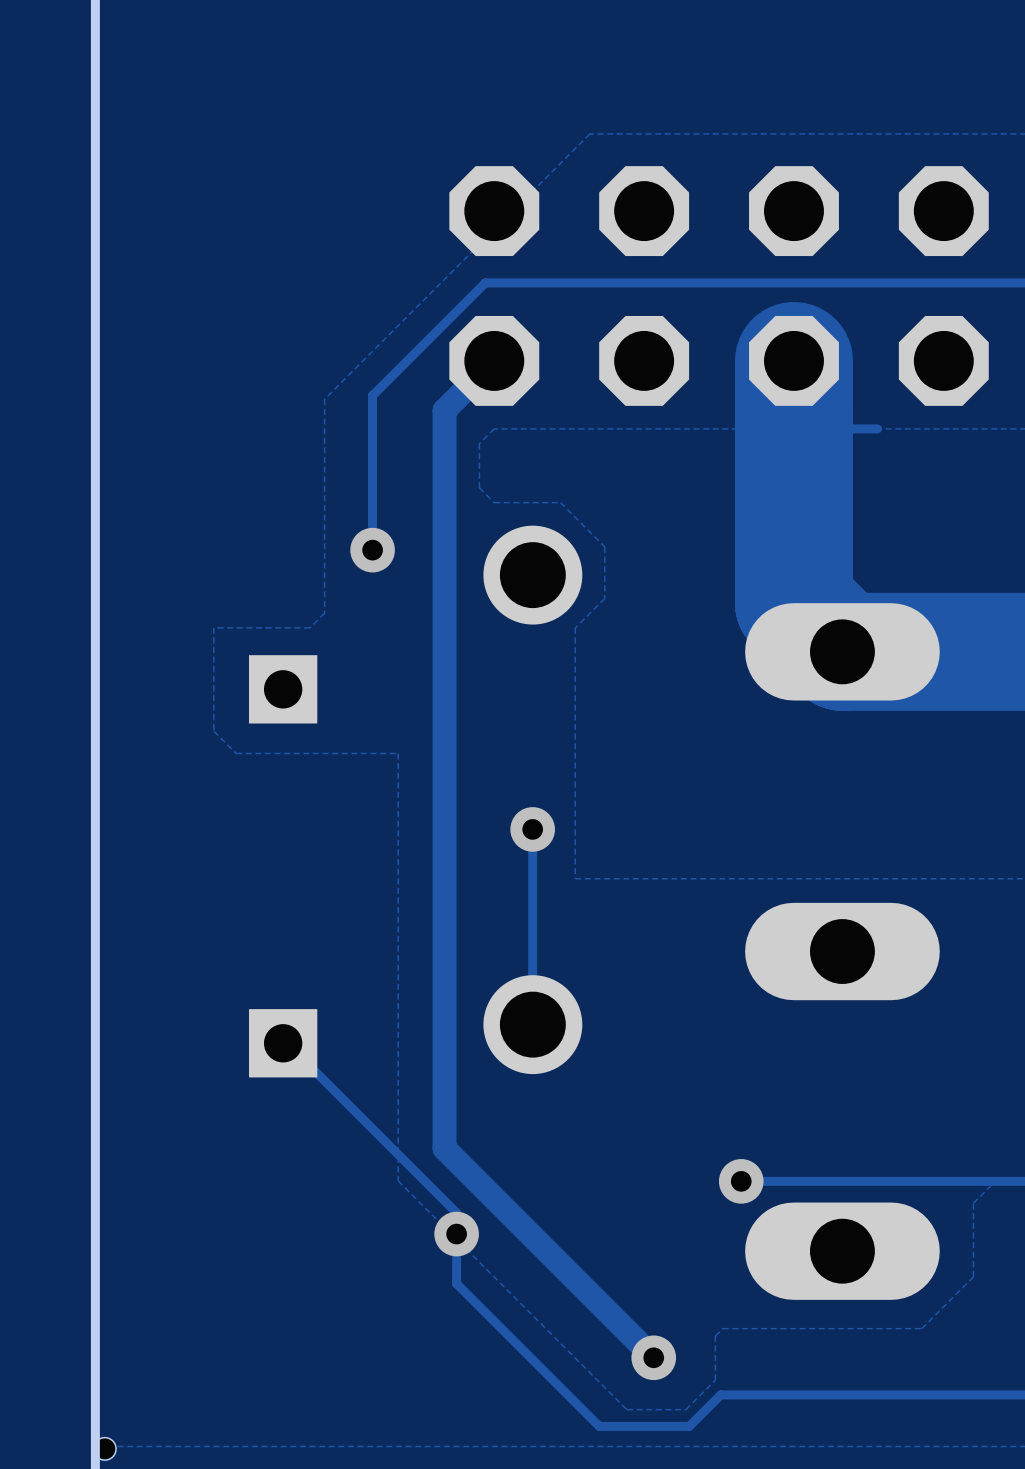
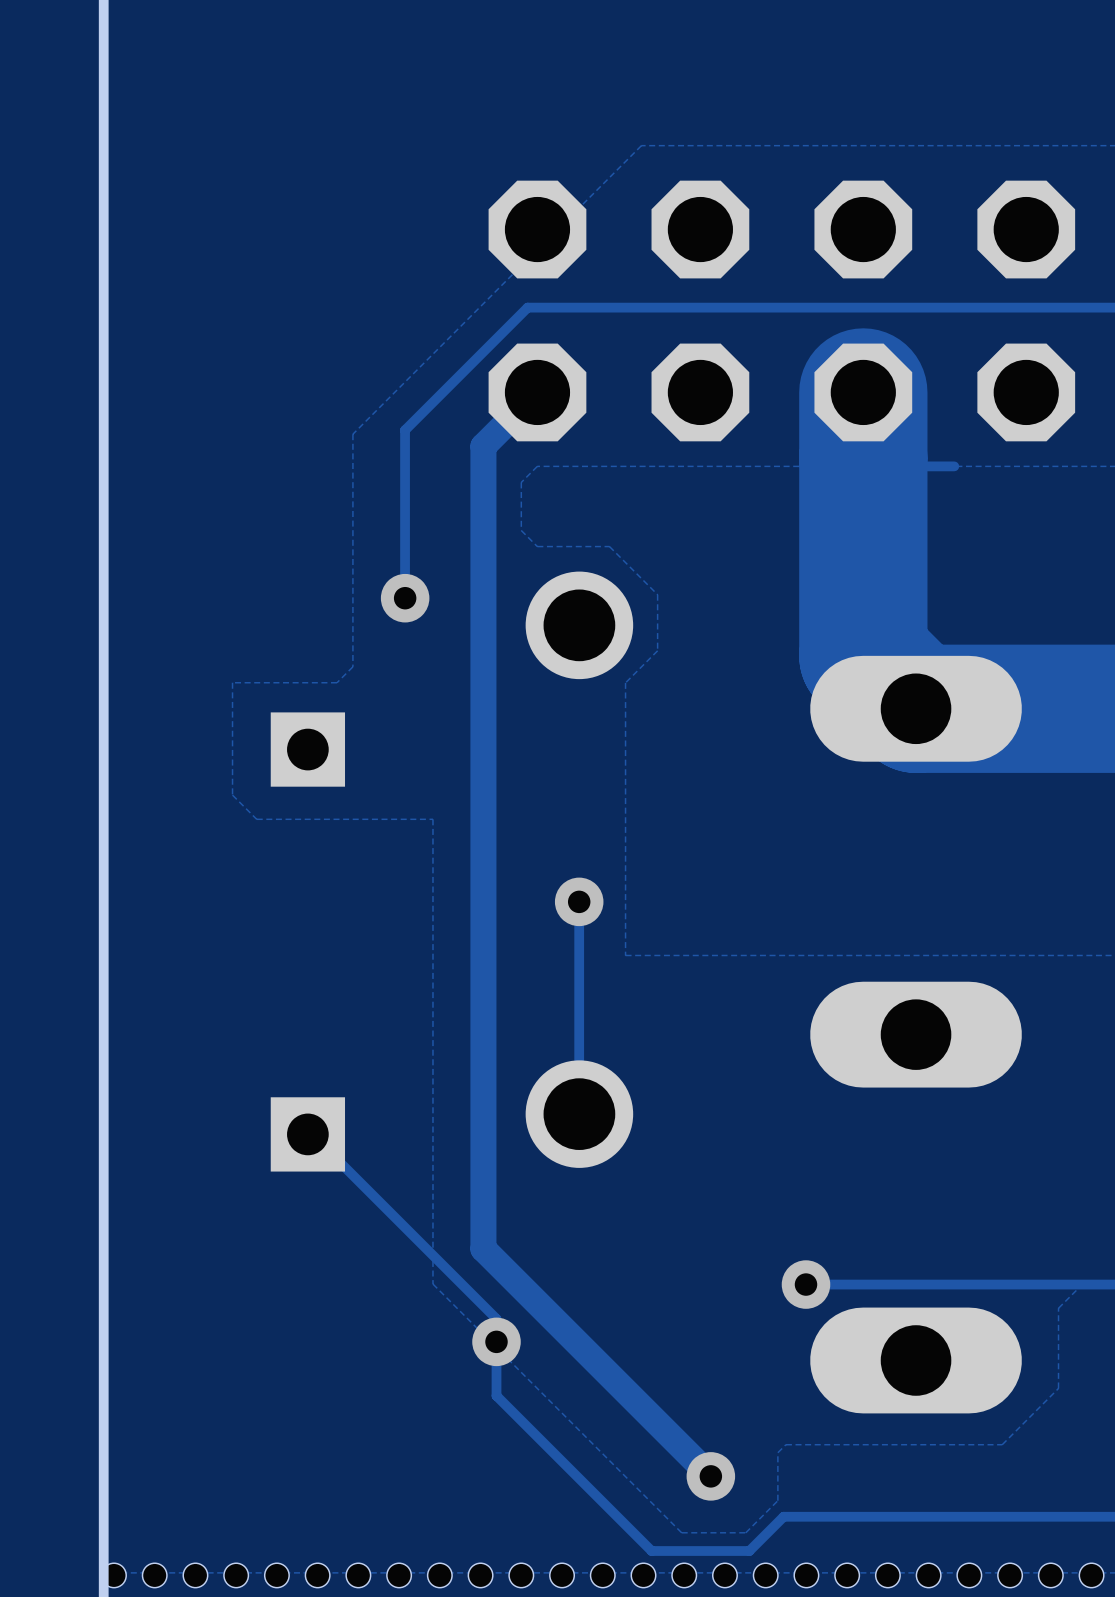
hole: none -> (154, 1575)
hole: none -> (195, 1575)
hole: none -> (236, 1575)
hole: none -> (276, 1575)
hole: none -> (317, 1575)
hole: none -> (358, 1575)
hole: none -> (399, 1575)
hole: none -> (439, 1575)
hole: none -> (480, 1575)
hole: none -> (521, 1575)
hole: none -> (562, 1575)
hole: none -> (602, 1575)
hole: none -> (643, 1575)
hole: none -> (684, 1575)
hole: none -> (724, 1575)
hole: none -> (765, 1575)
hole: none -> (806, 1575)
hole: none -> (847, 1575)
hole: none -> (887, 1575)
hole: none -> (928, 1575)
hole: none -> (969, 1575)
hole: none -> (1010, 1575)
hole: none -> (1050, 1575)
hole: none -> (1091, 1575)

